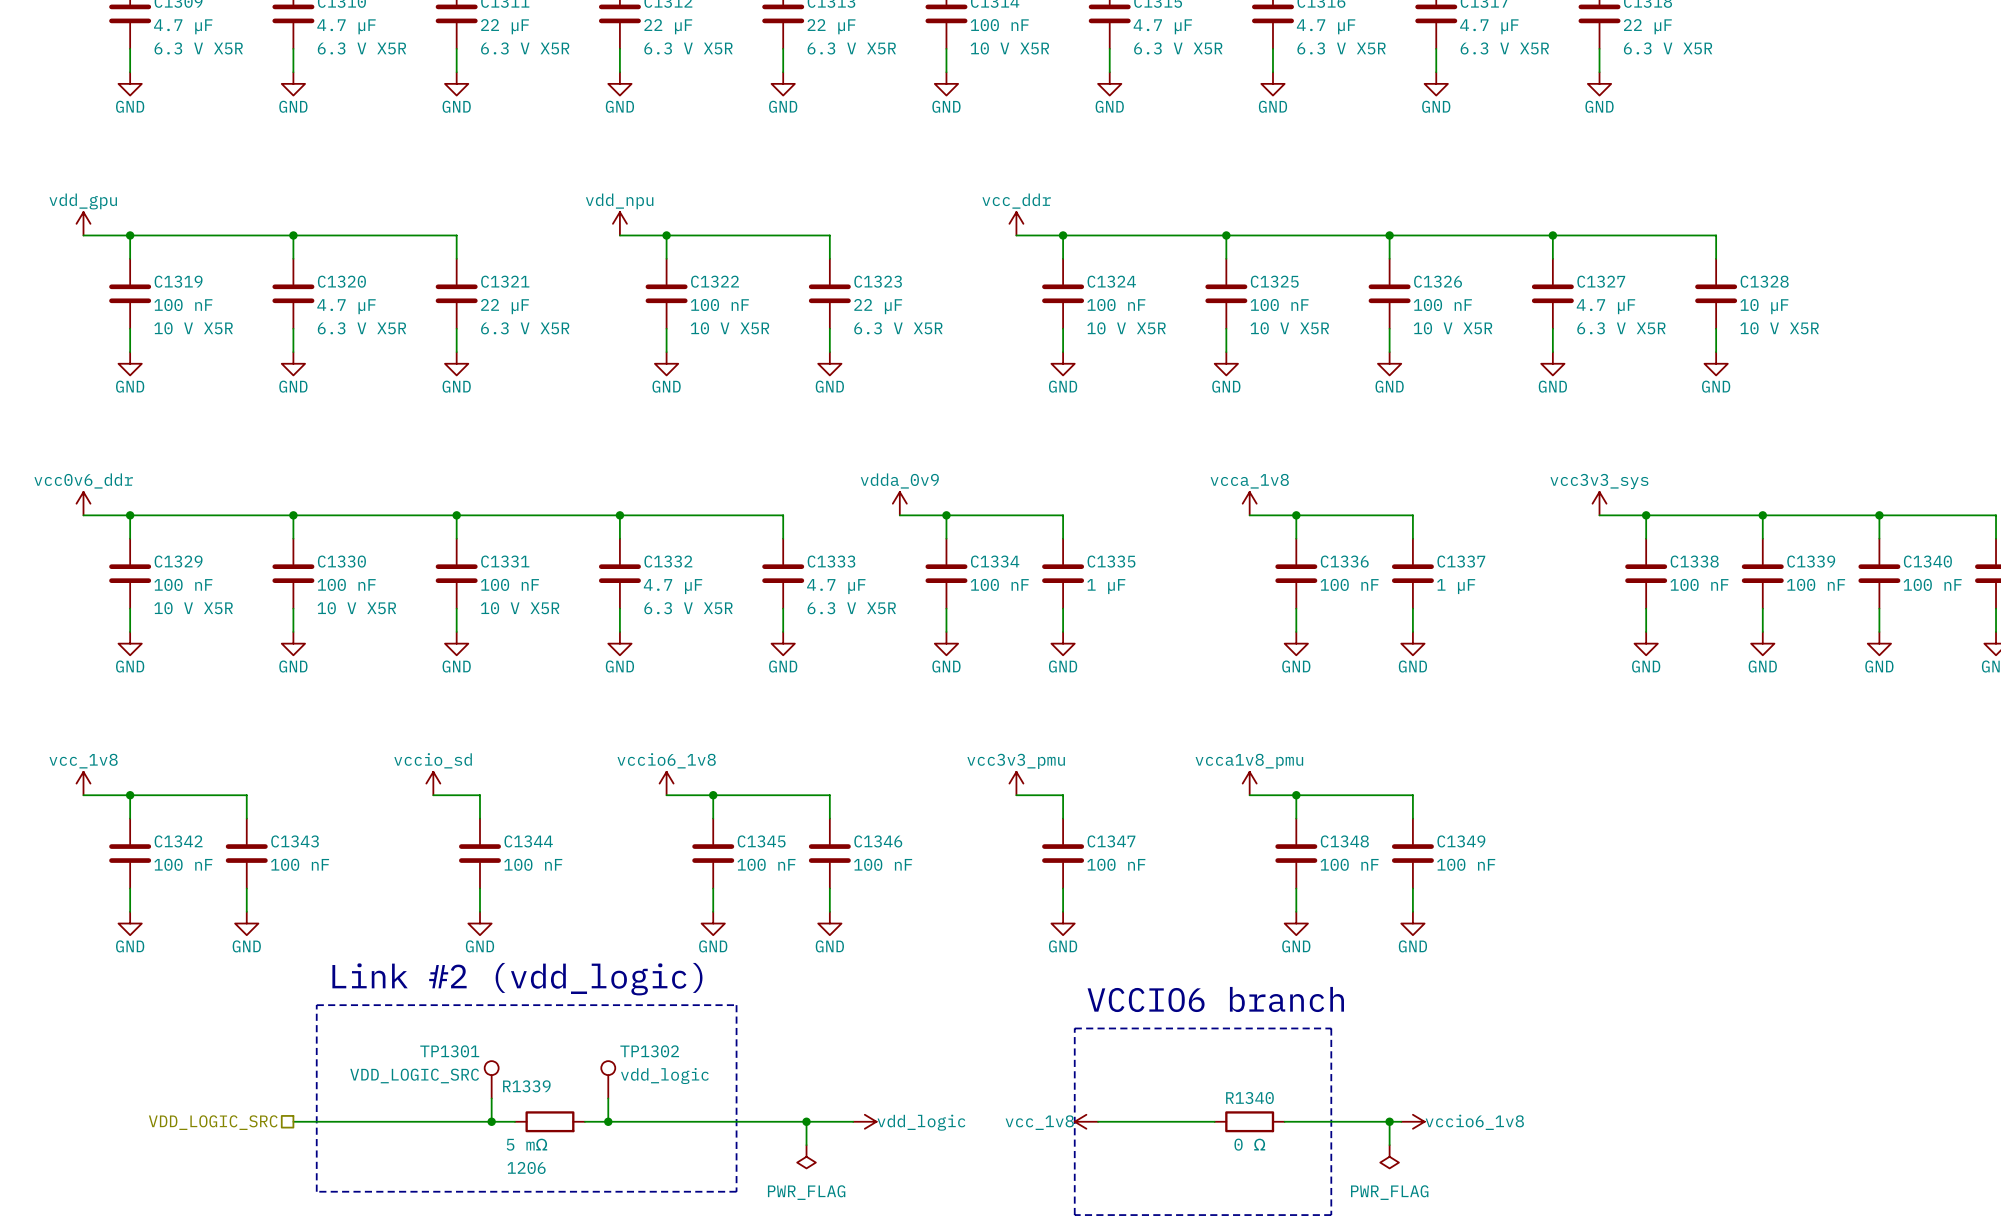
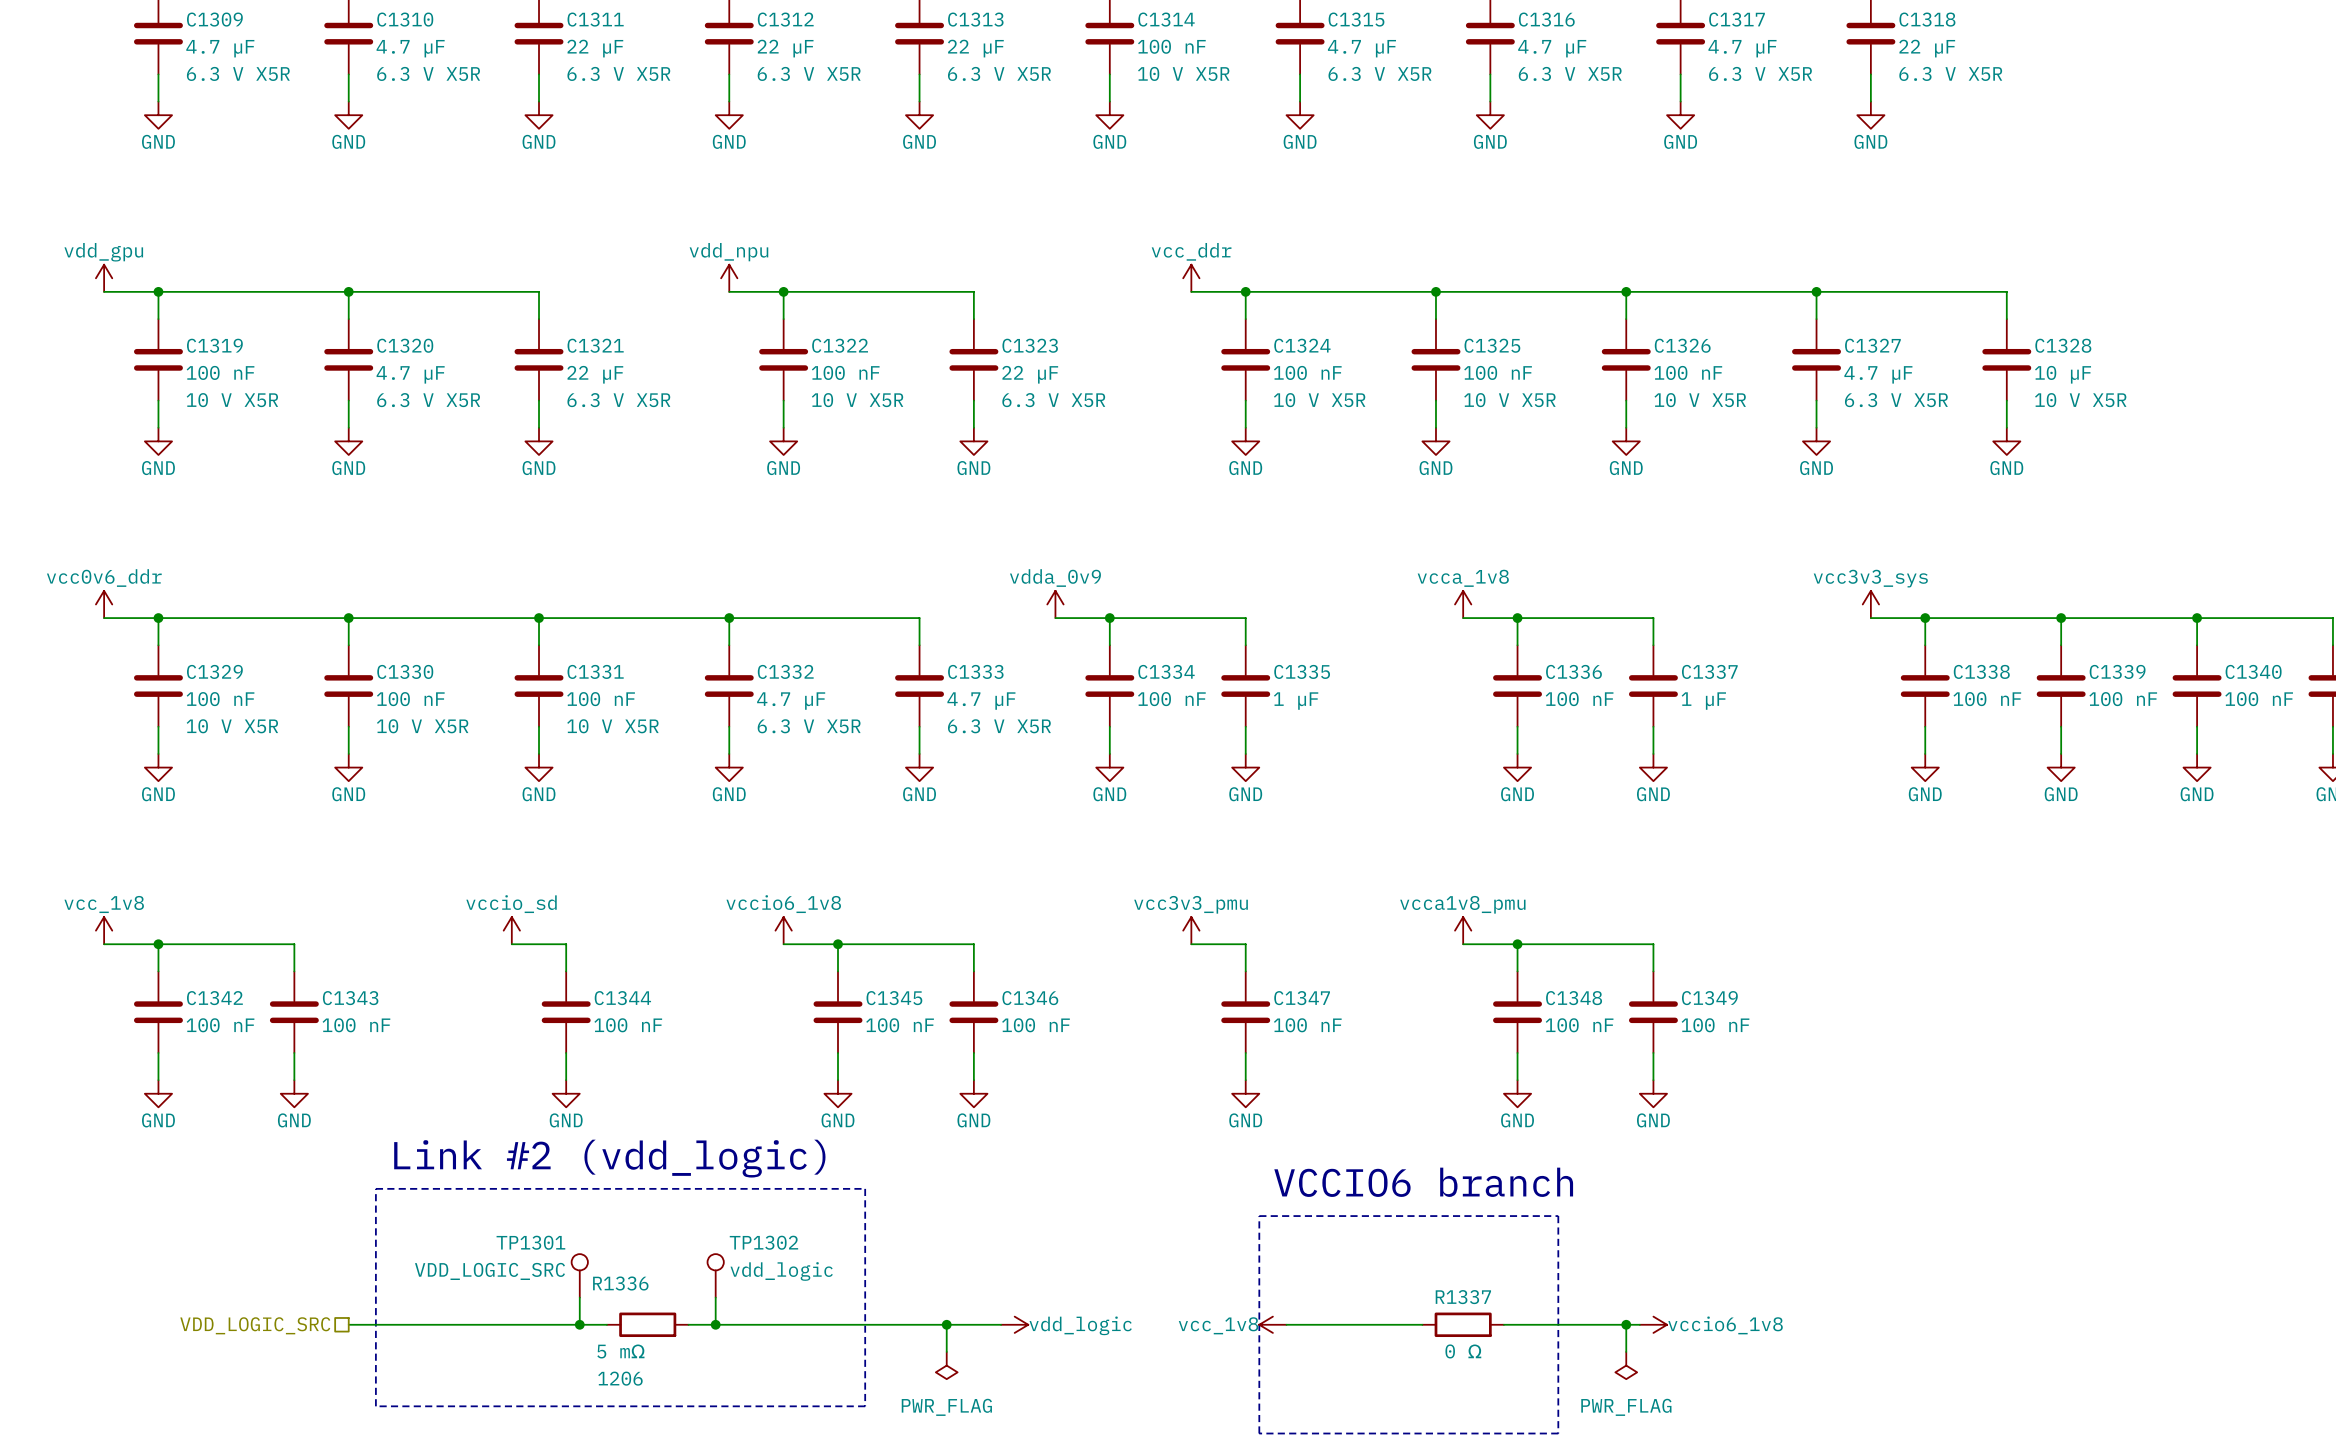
R1339 name: R1339 (526, 1086) -> R1336 (620, 1283)
R1340 name: R1340 (1249, 1098) -> R1337 (1463, 1297)

